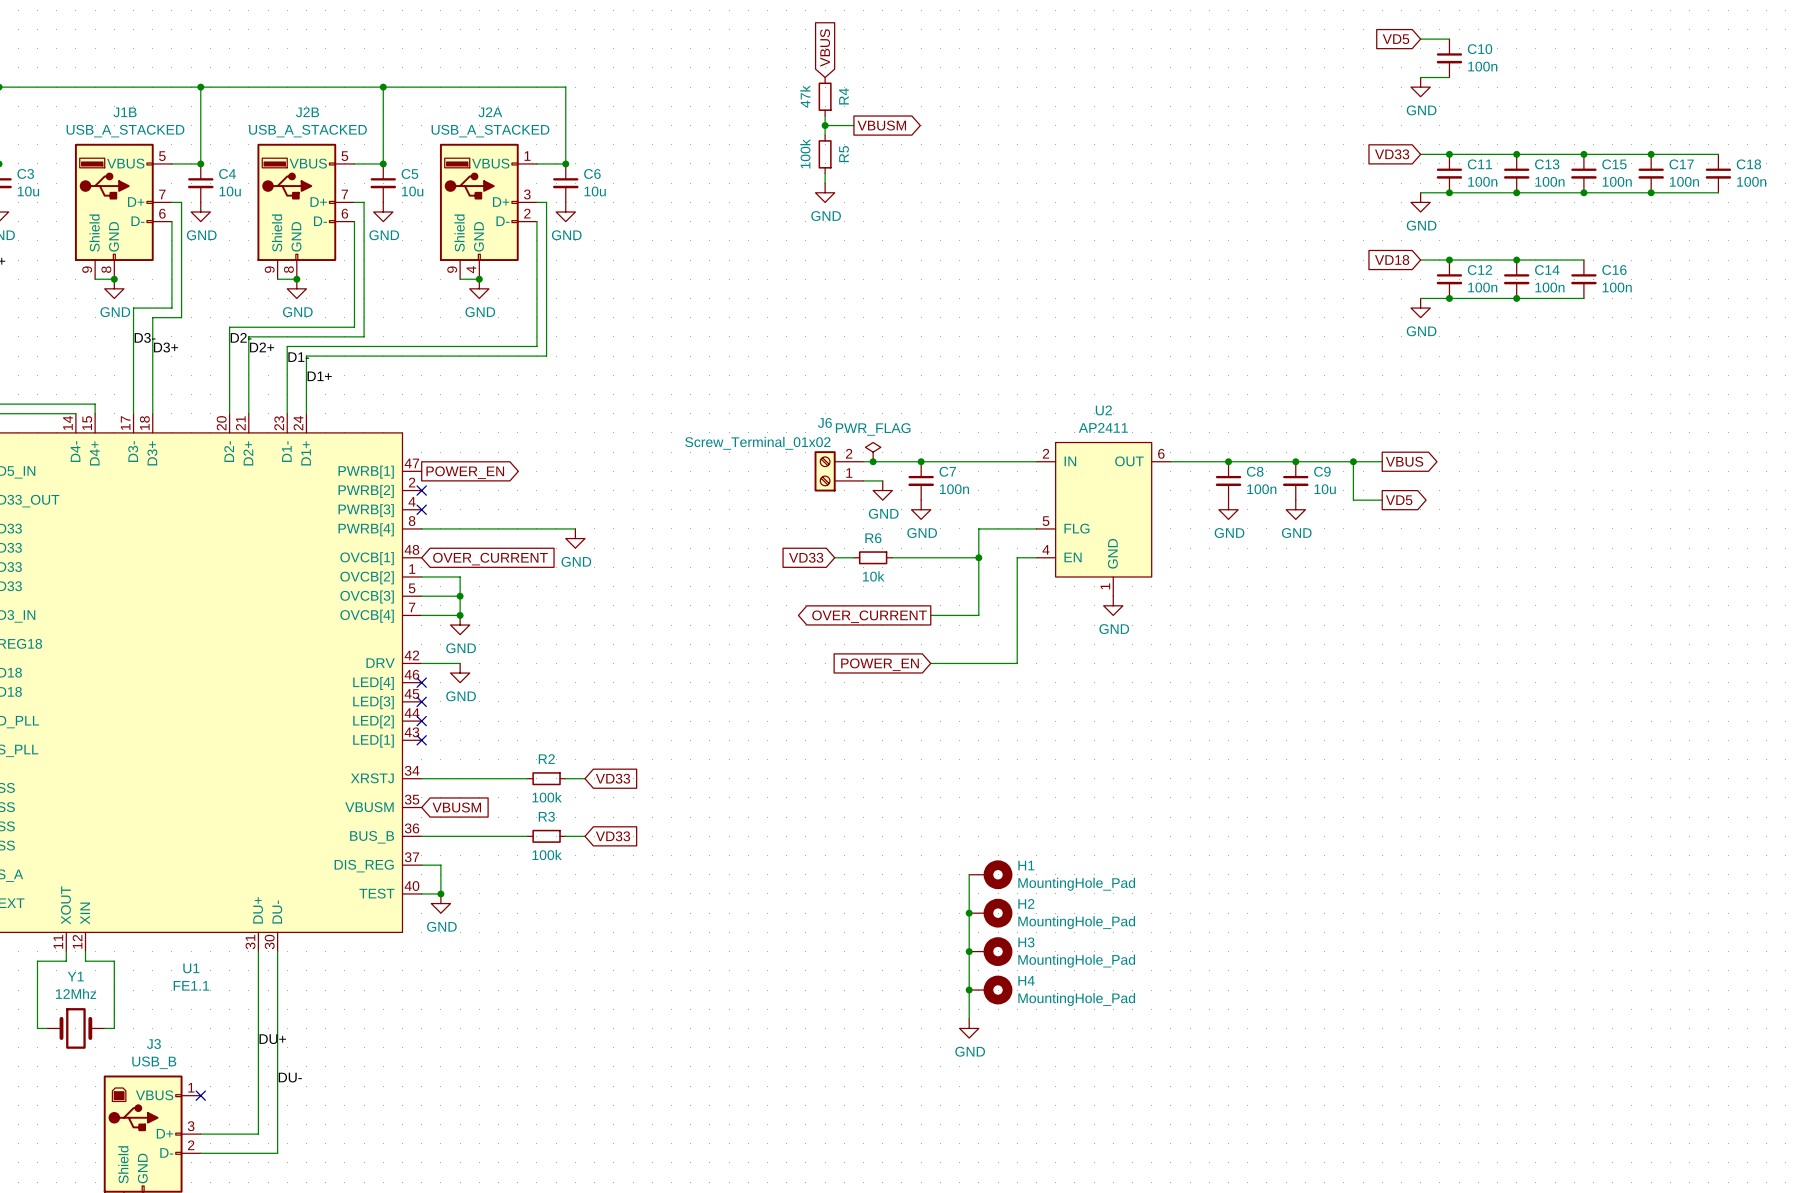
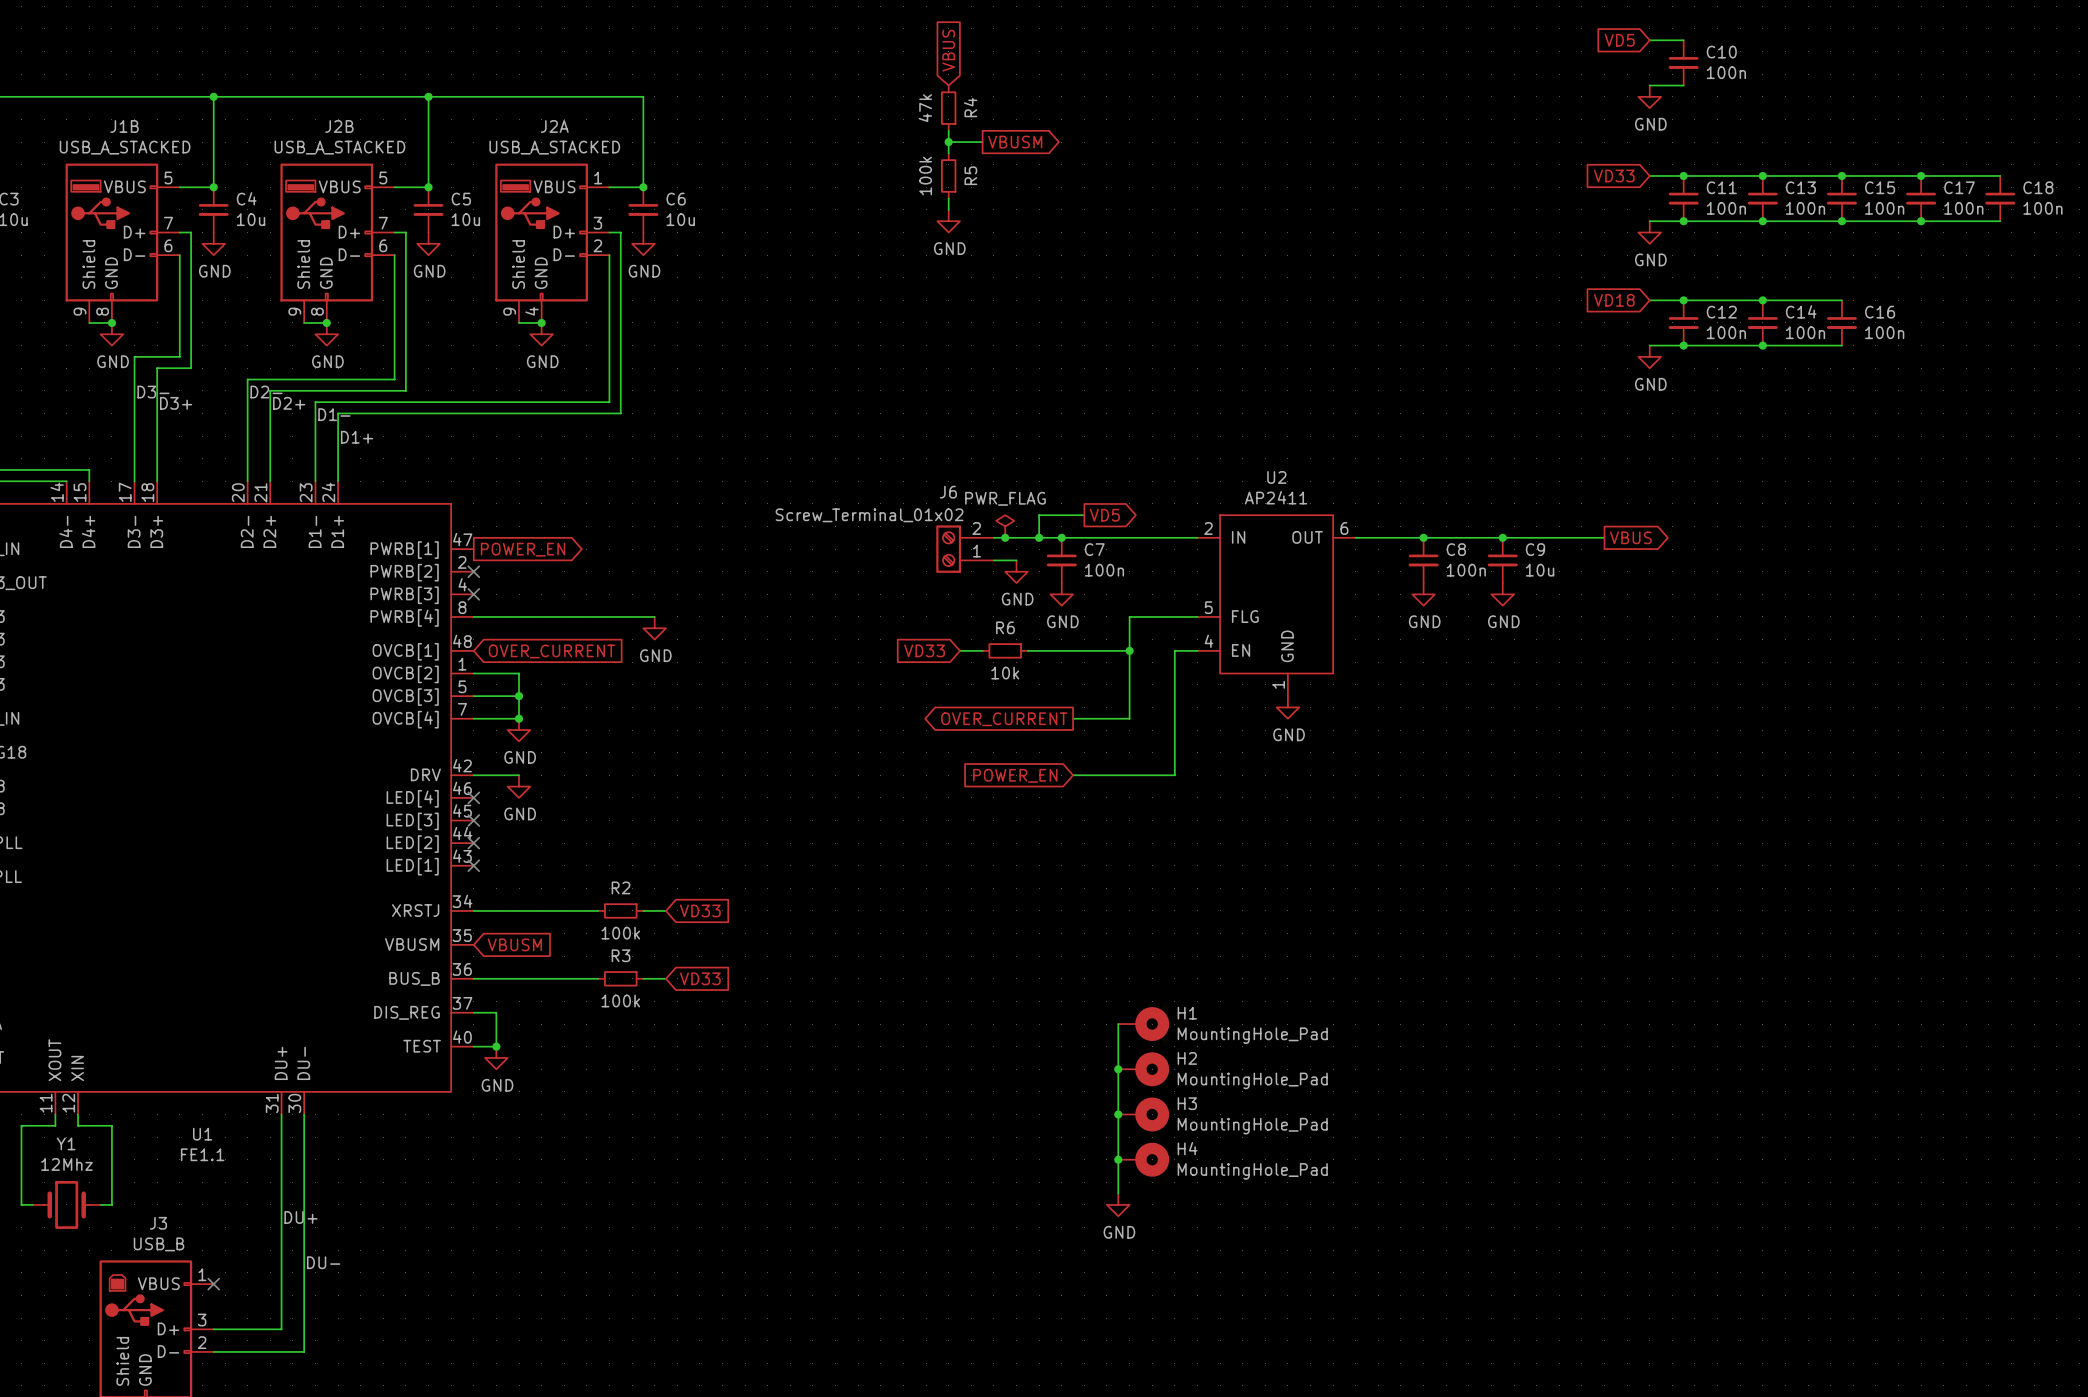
wire: none -> (1084, 515) (1039, 515) (1039, 537)
global label: none -> VD5 (1104, 515)
junction: none -> (1039, 537)
wire: (1353, 461) (1353, 500) (1382, 500) -> none
junction: (1353, 461) -> none
global label: VD5 (1399, 500) -> none

